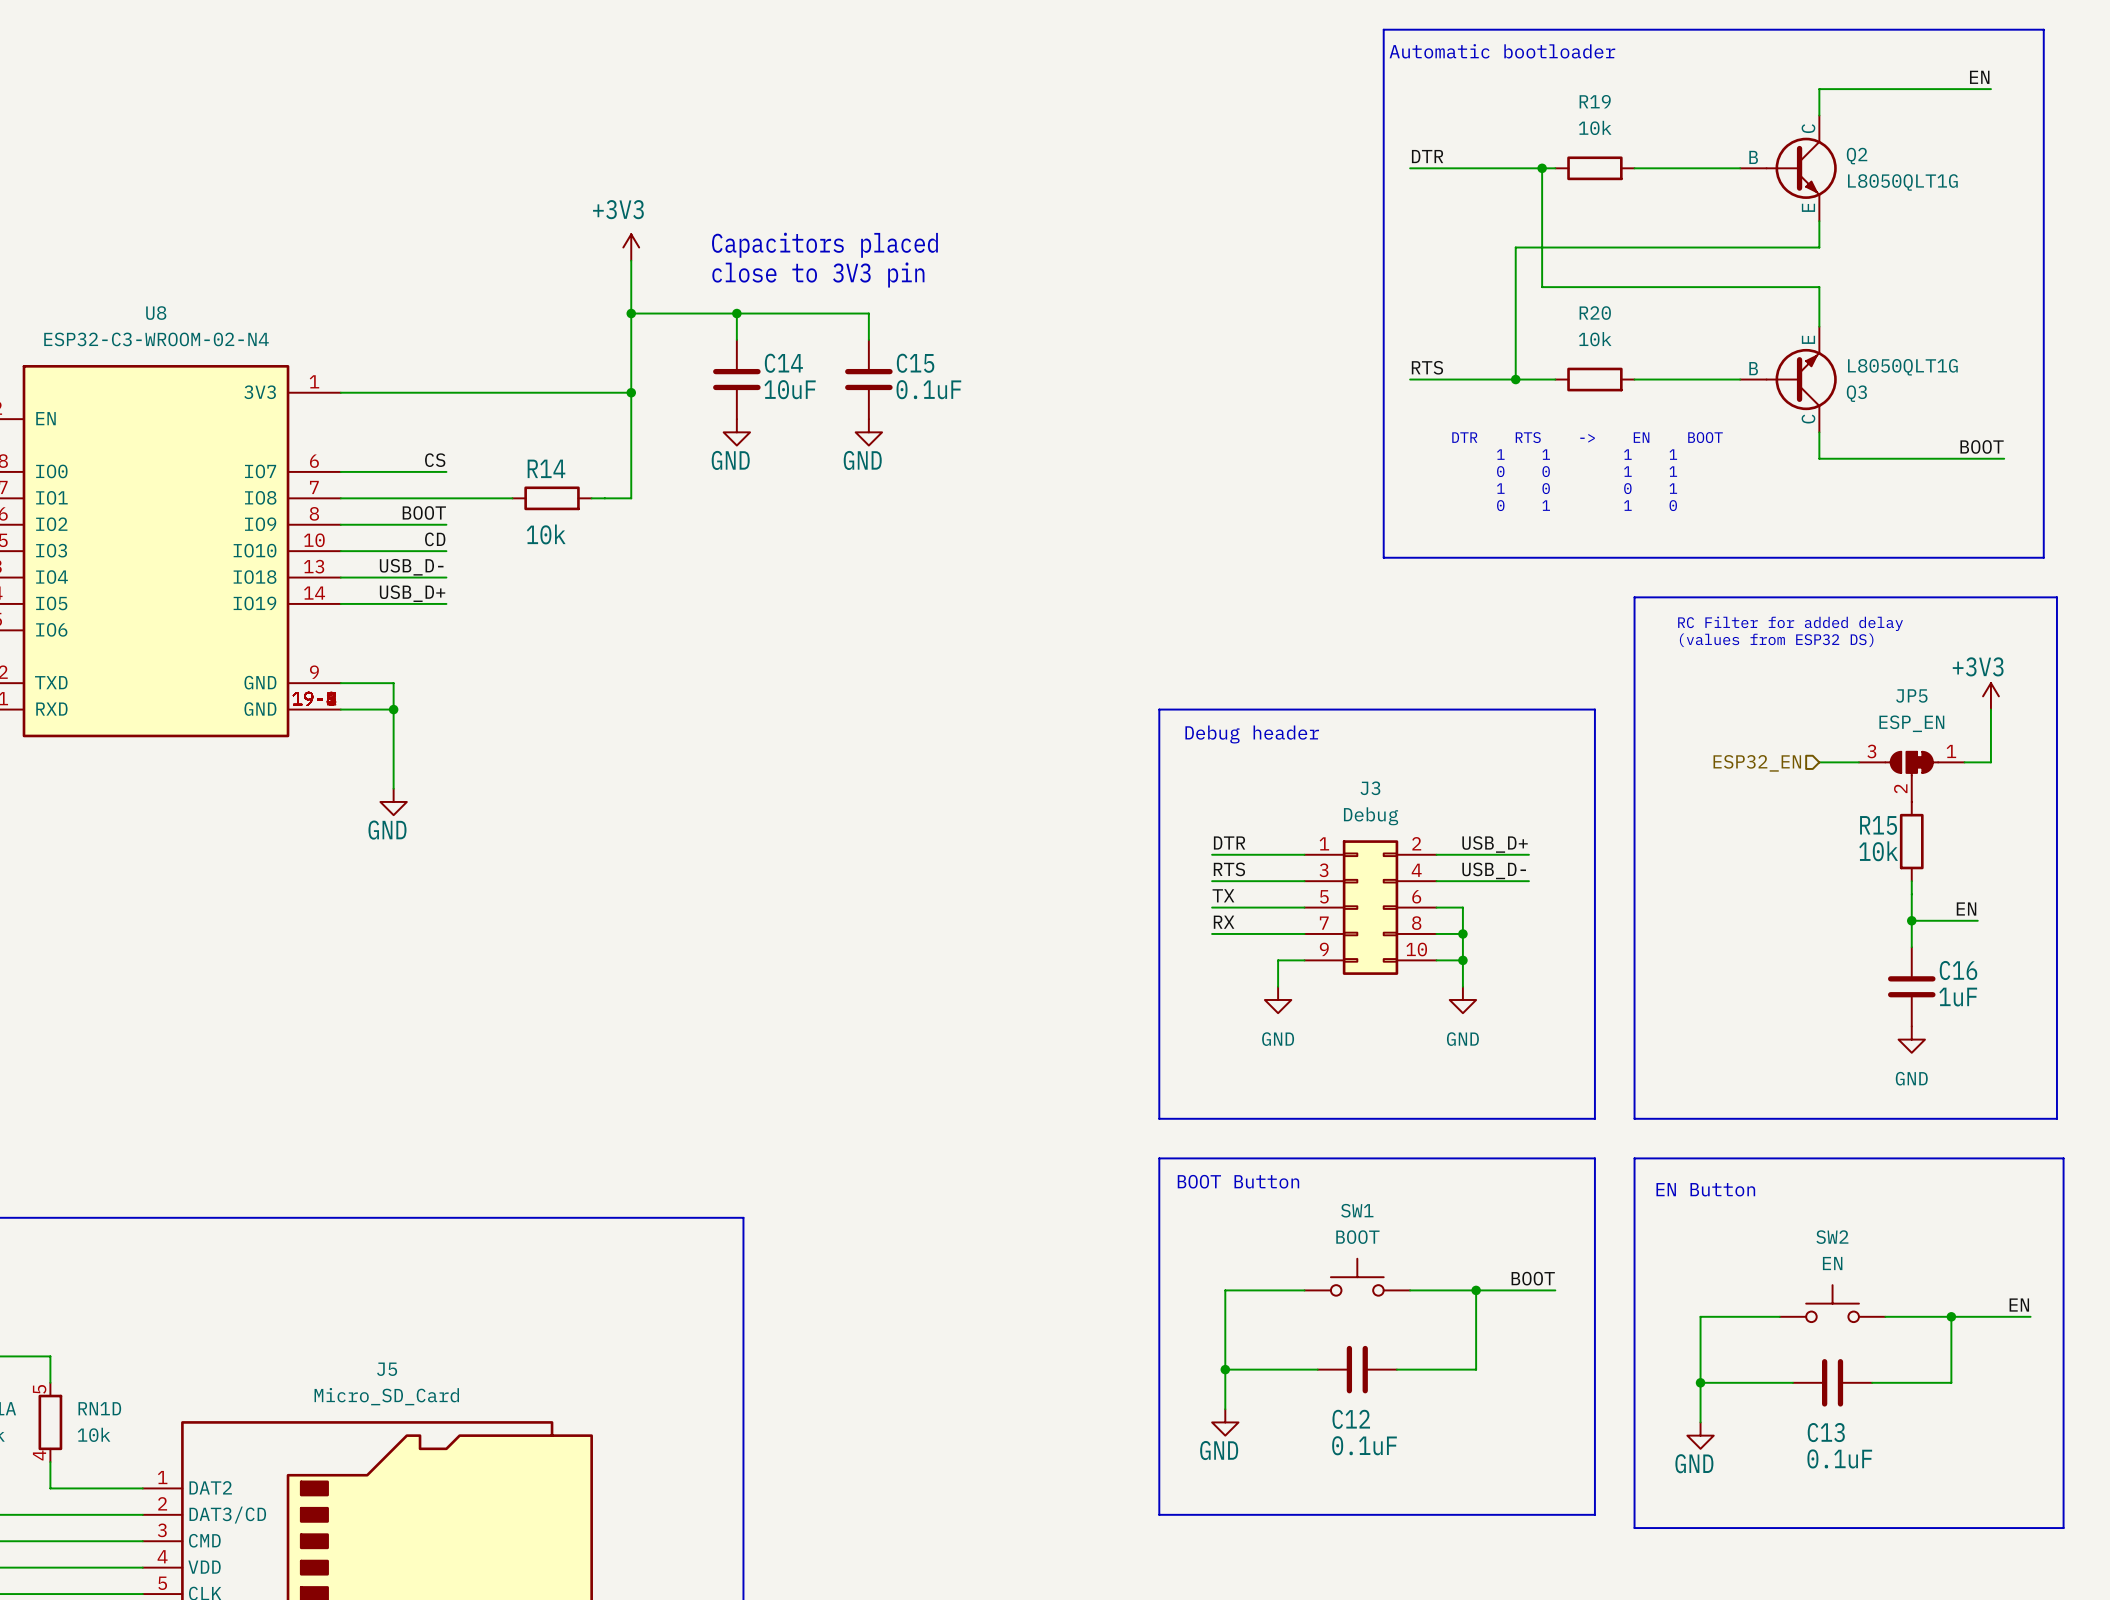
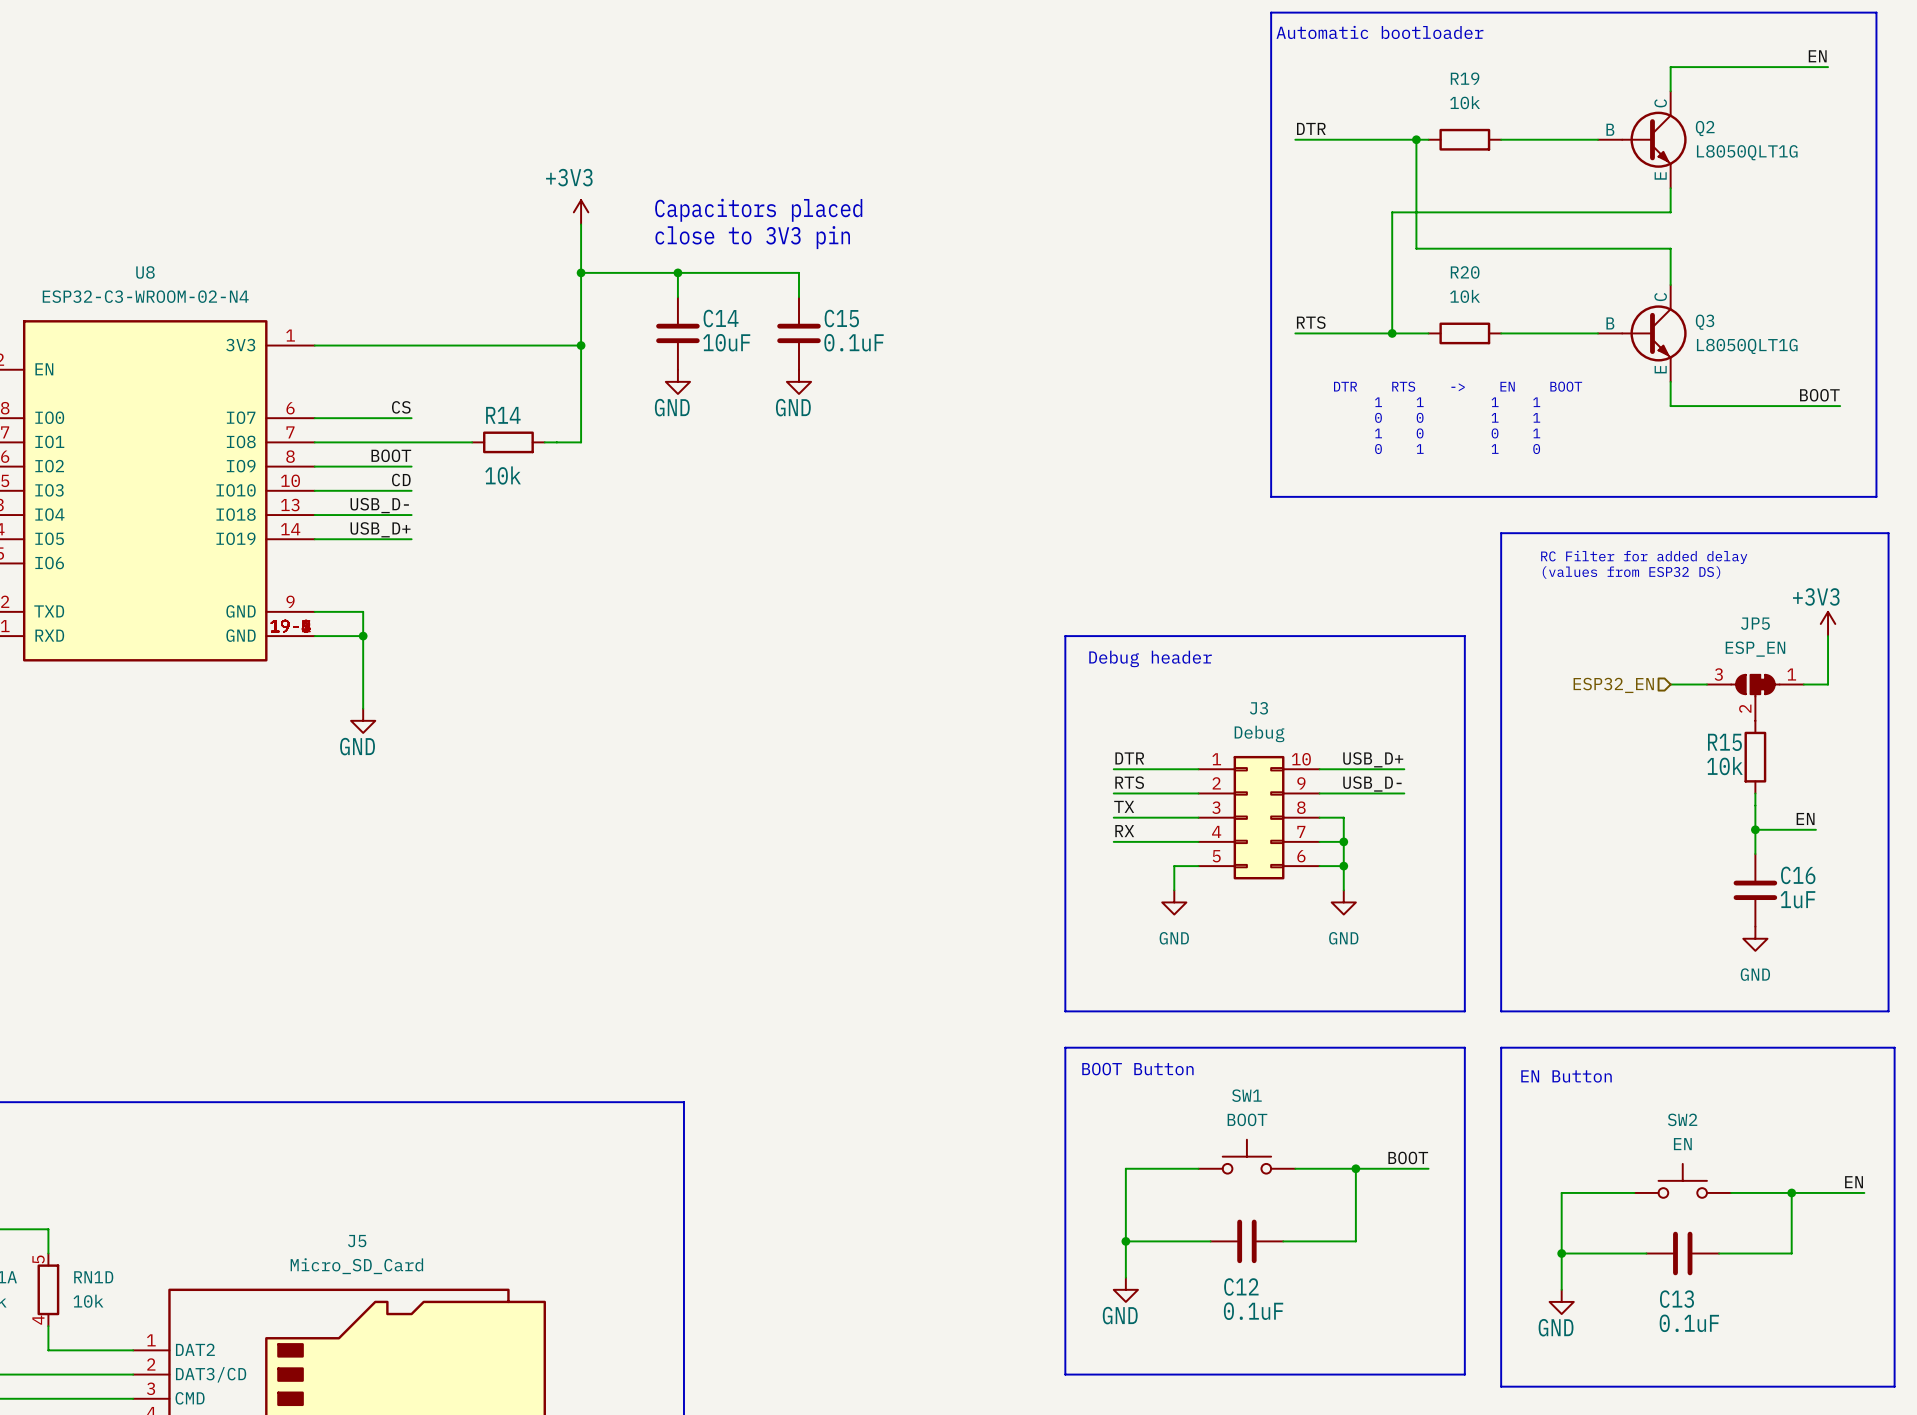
Q3 flip: as is (1801, 379) -> up-down (1654, 333)
J3 symbol: [1304, 840, 1437, 975] -> [1198, 755, 1320, 880]

